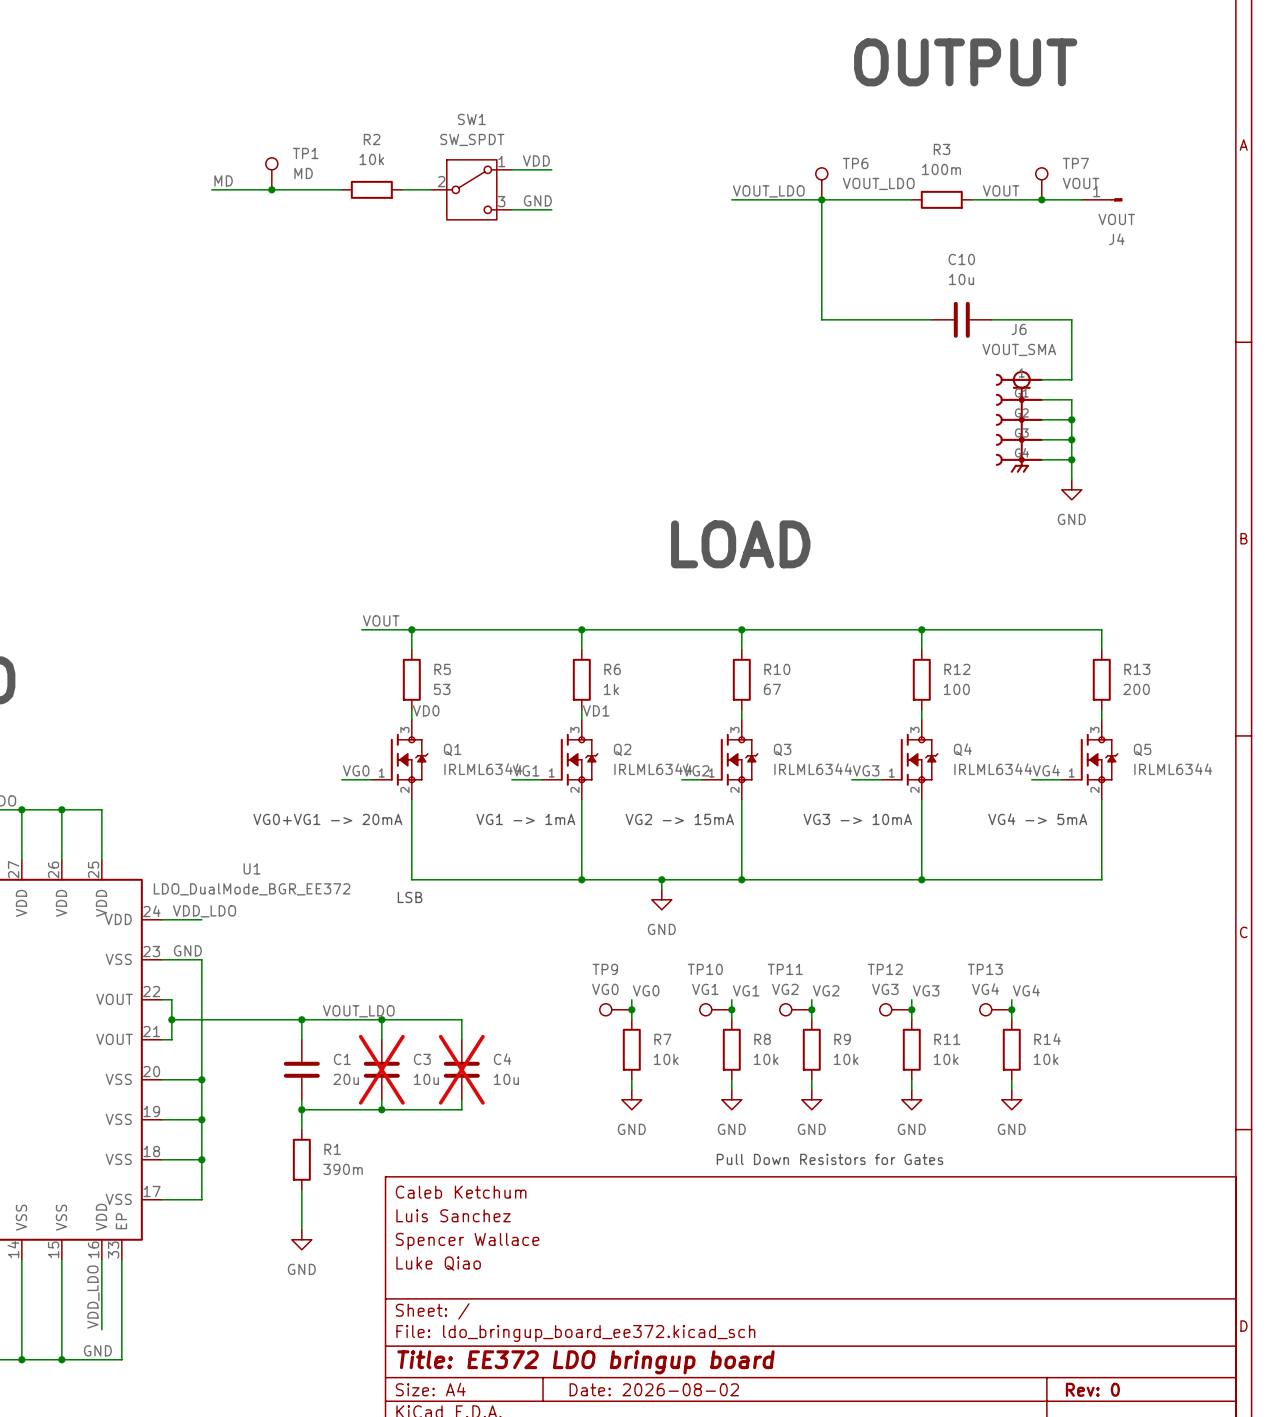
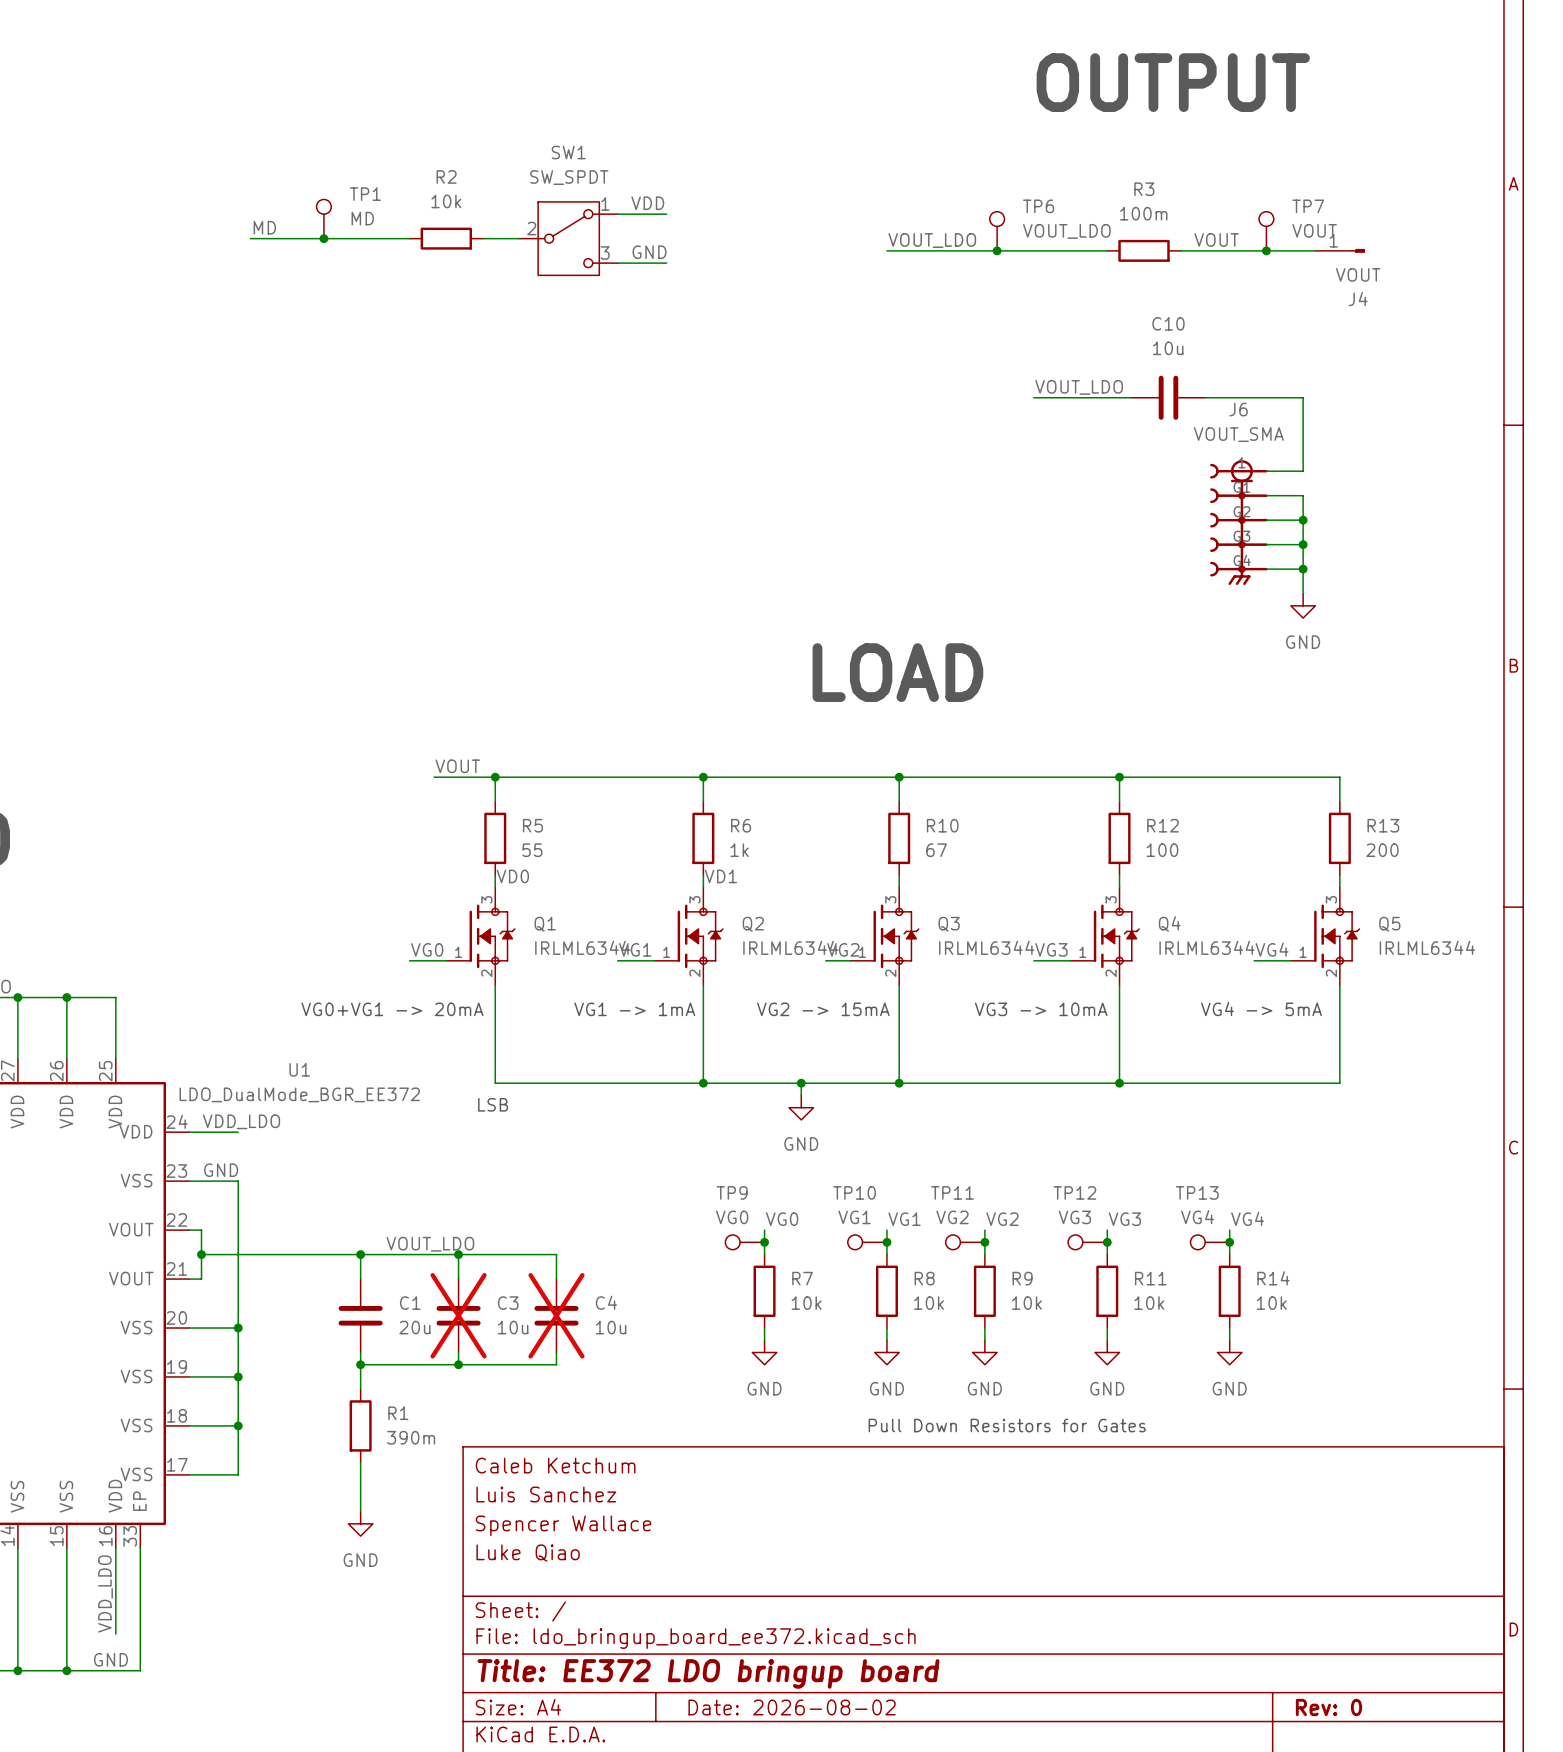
wire: (821, 199) (821, 319) (851, 319) -> none
label: none -> VOUT_LDO (1079, 387)
R5 value: 53 (442, 689) -> 55 (532, 850)

